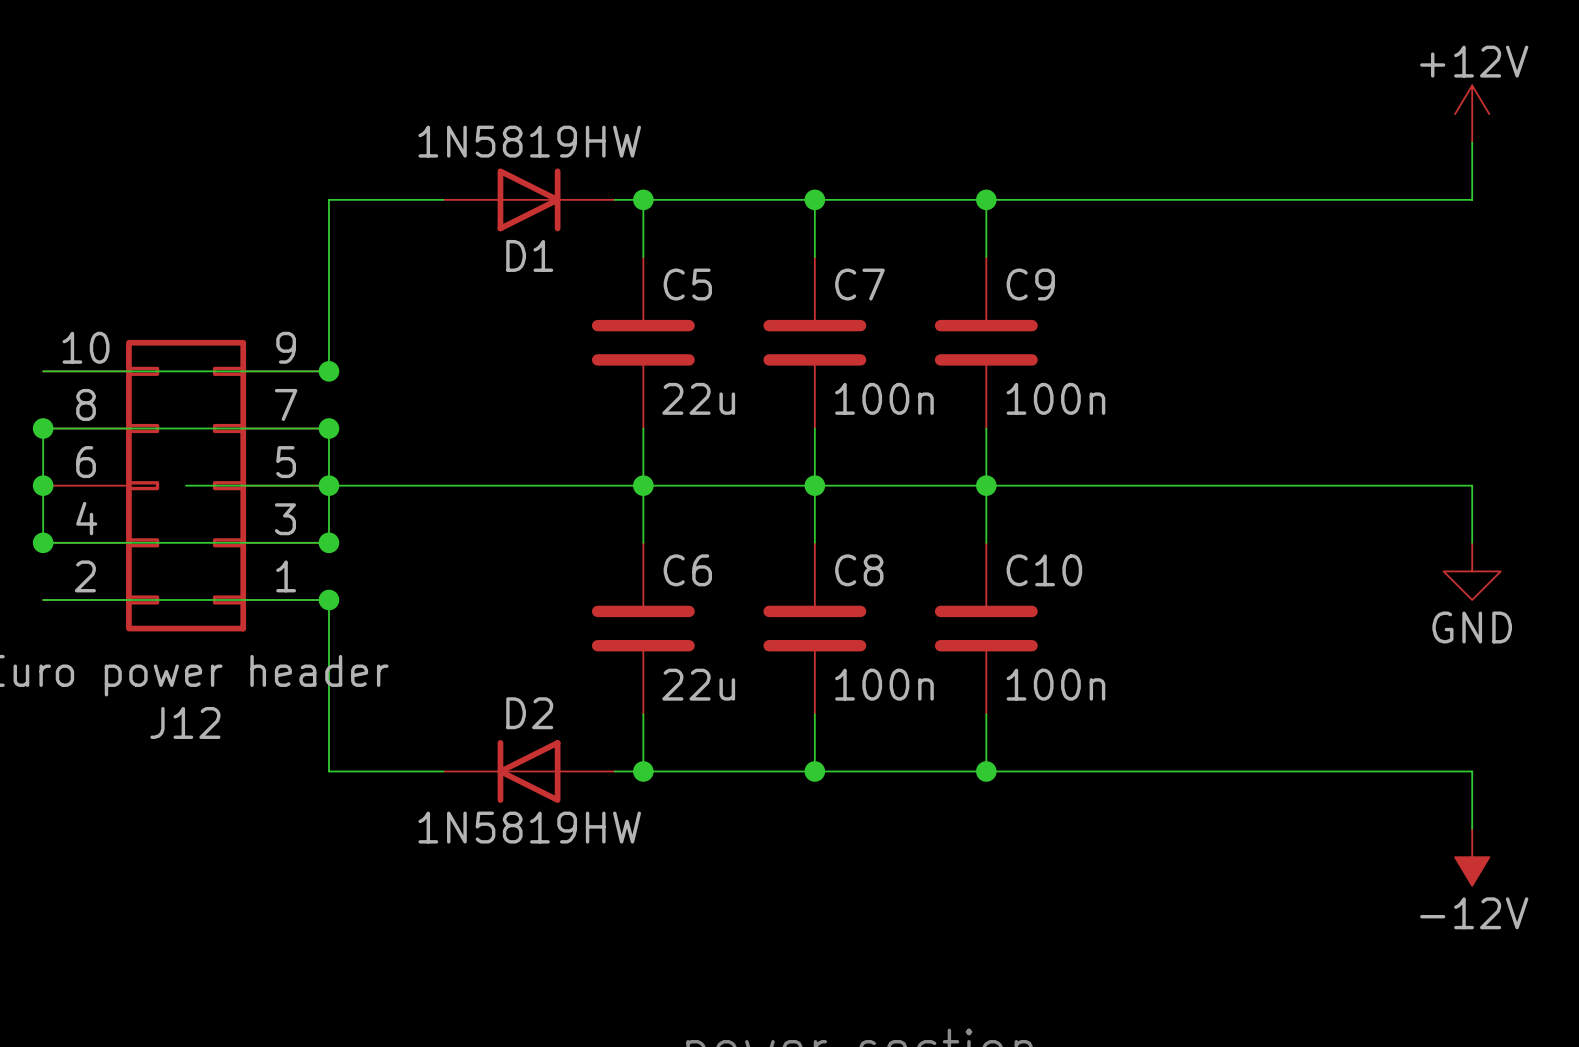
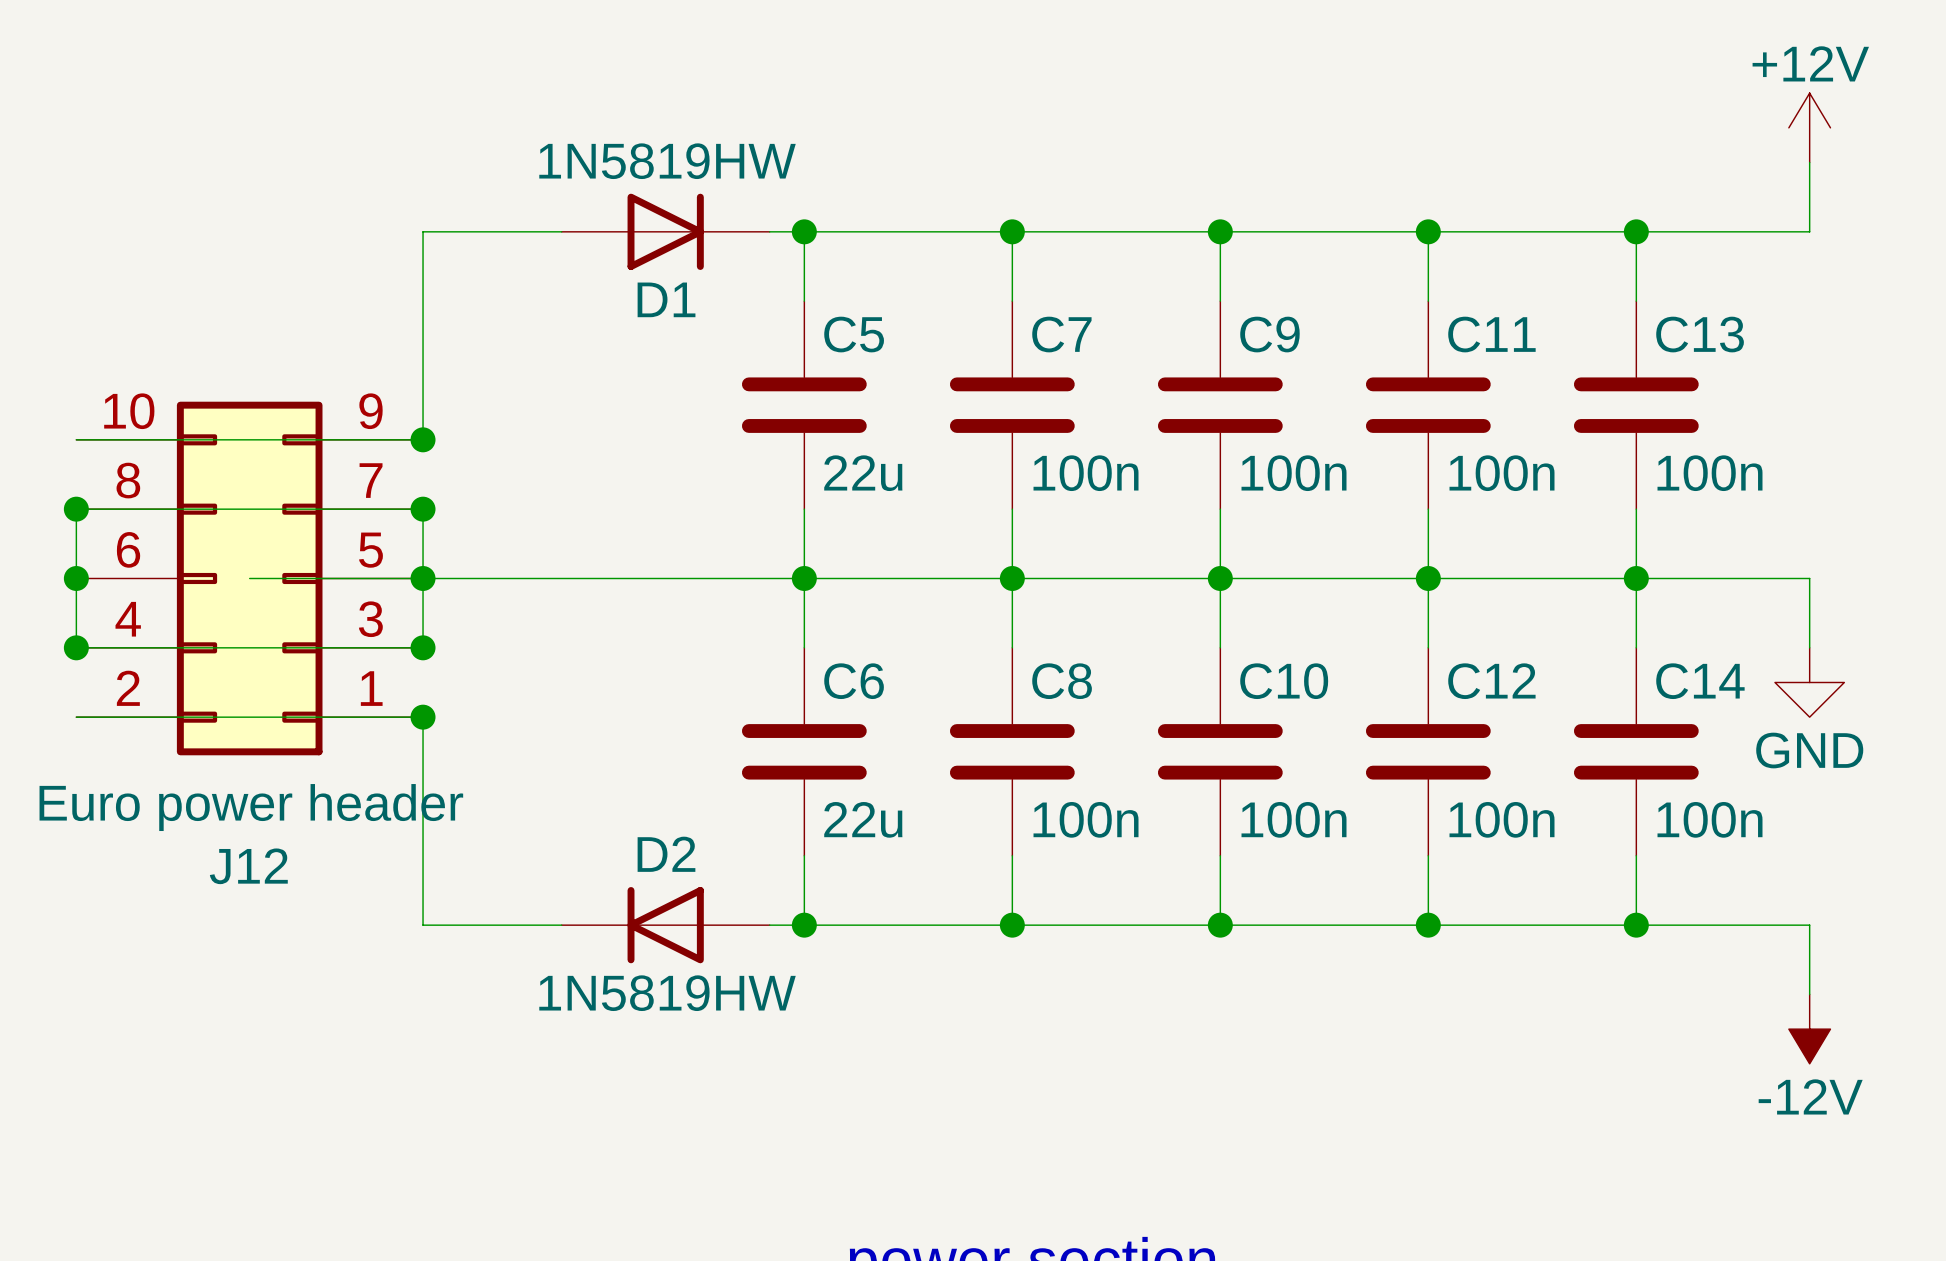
wire: none -> (1428, 231) (1428, 301)
junction: none -> (1428, 231)
wire: none -> (1636, 231) (1636, 301)
junction: none -> (1636, 231)
C11: none -> 100n (1428, 405)
C13: none -> 100n (1636, 405)
wire: none -> (1428, 509) (1428, 647)
wire: none -> (1636, 509) (1636, 647)
junction: none -> (1428, 578)
junction: none -> (1636, 578)
C12: none -> 100n (1428, 751)
C14: none -> 100n (1636, 751)
wire: none -> (1428, 855) (1428, 925)
wire: none -> (1636, 855) (1636, 925)
junction: none -> (1428, 925)
junction: none -> (1636, 925)

